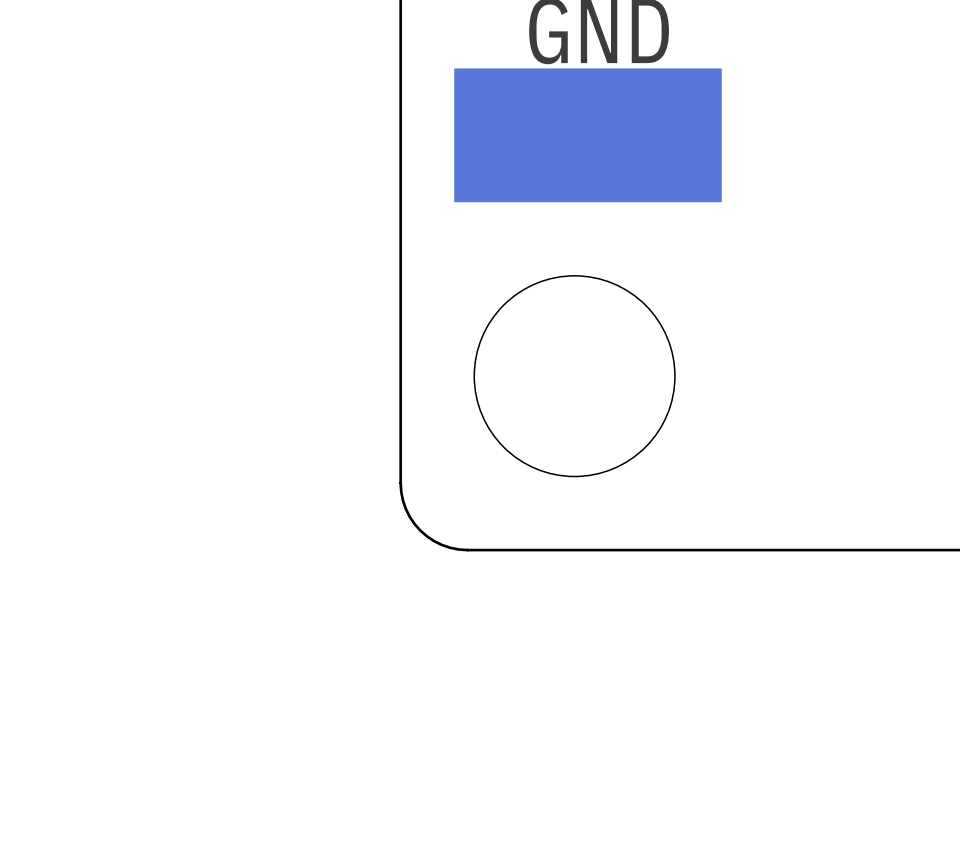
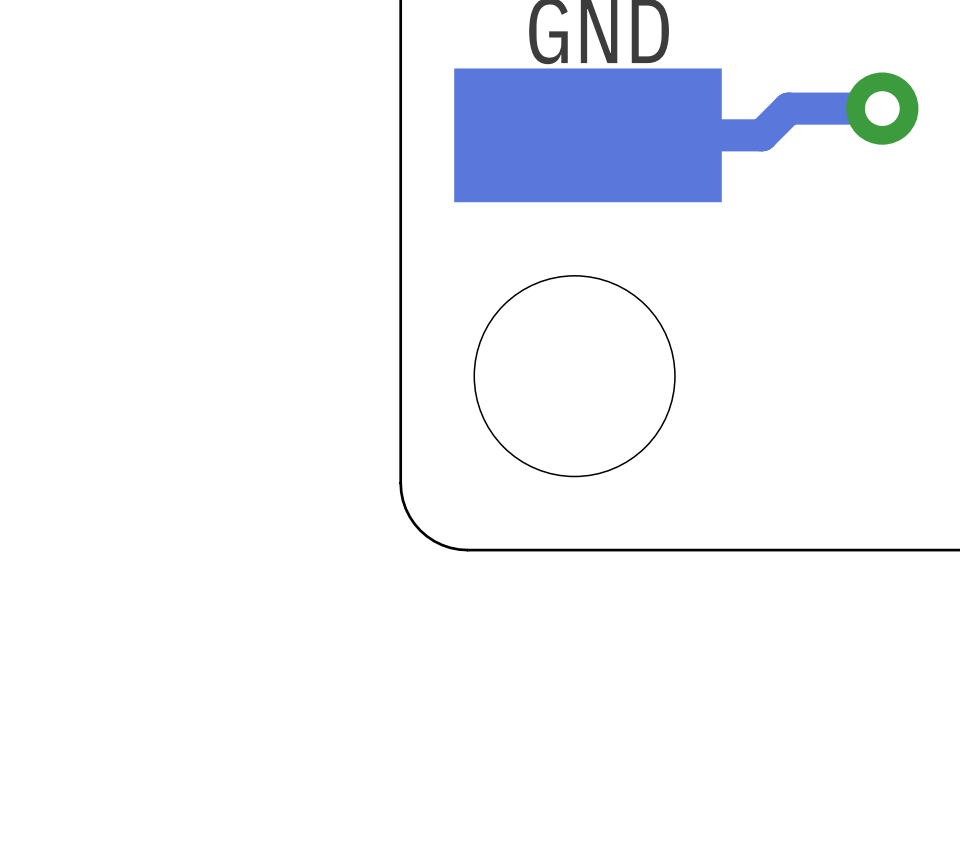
track: none -> (882, 108) (788, 108) (761, 135) (587, 135)
via: none -> (882, 108)

